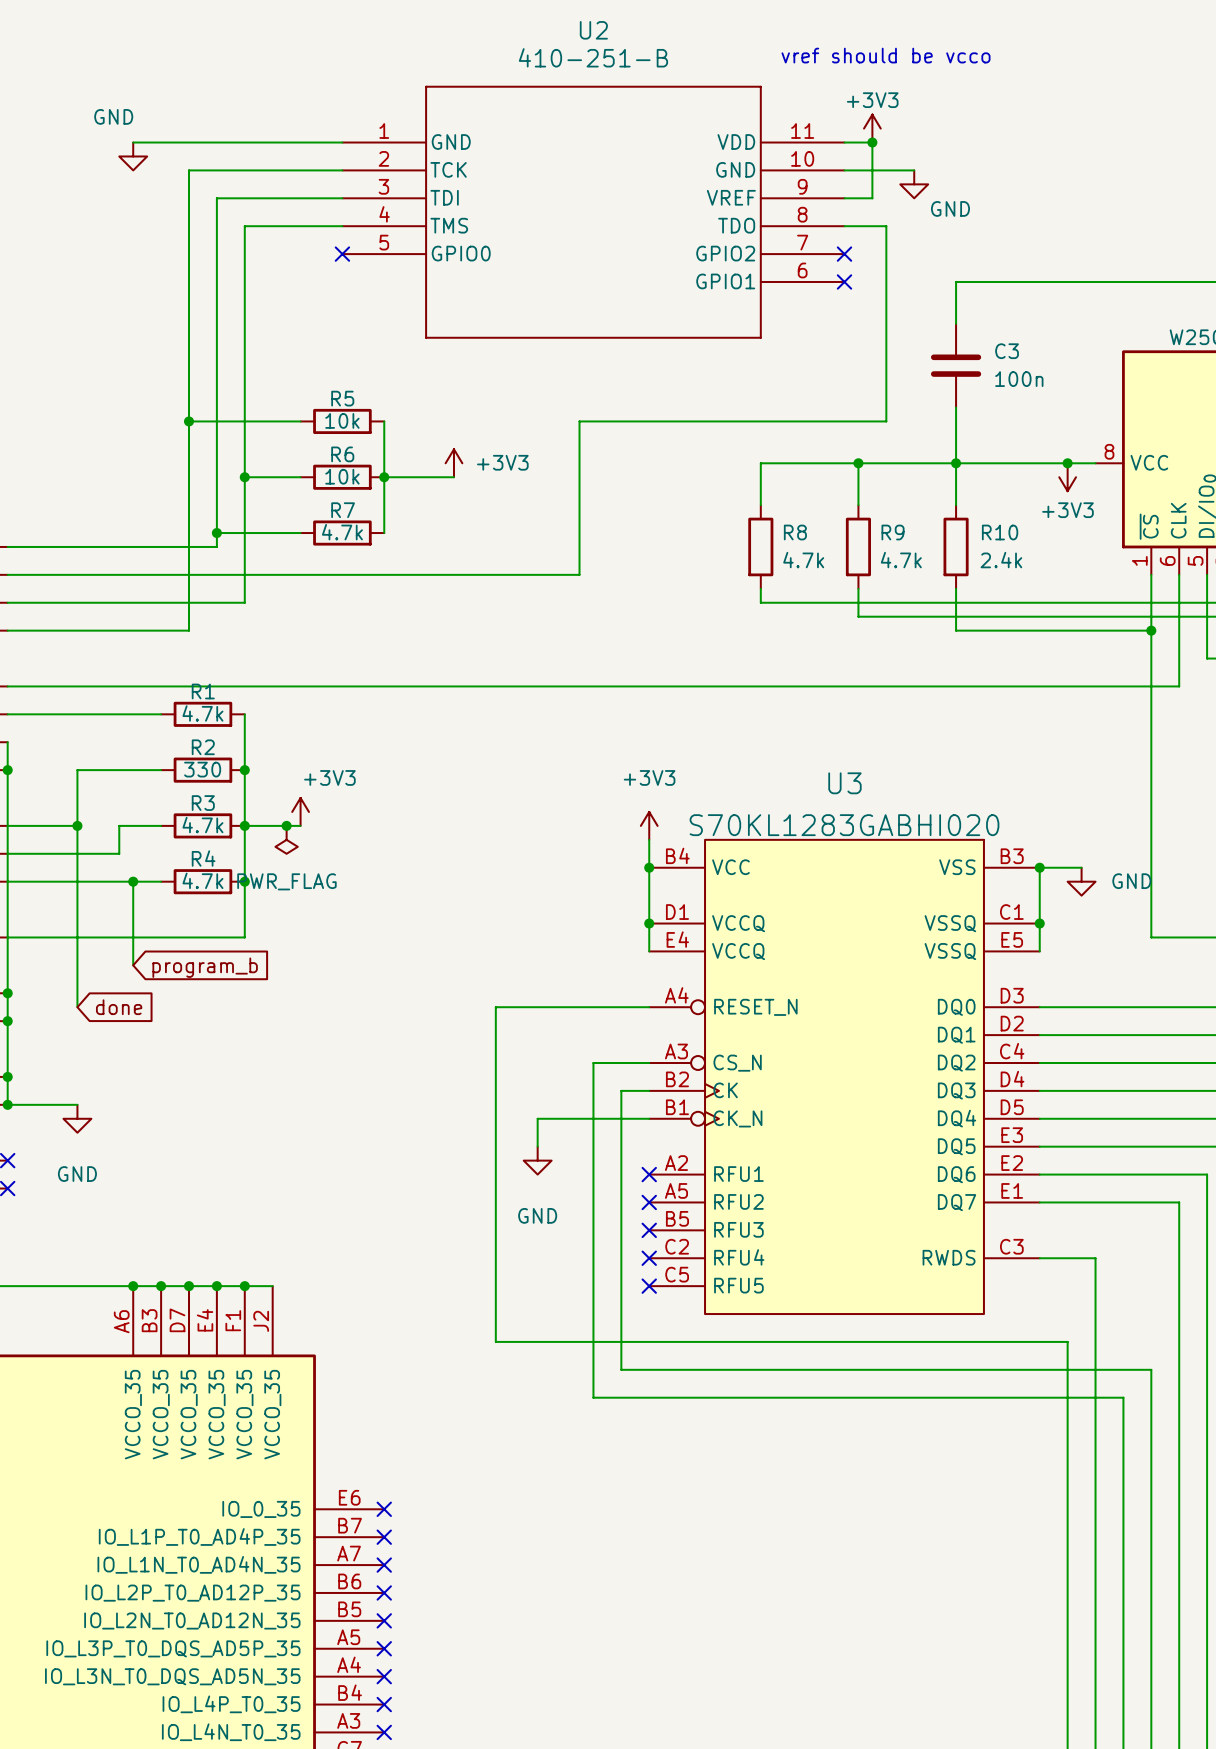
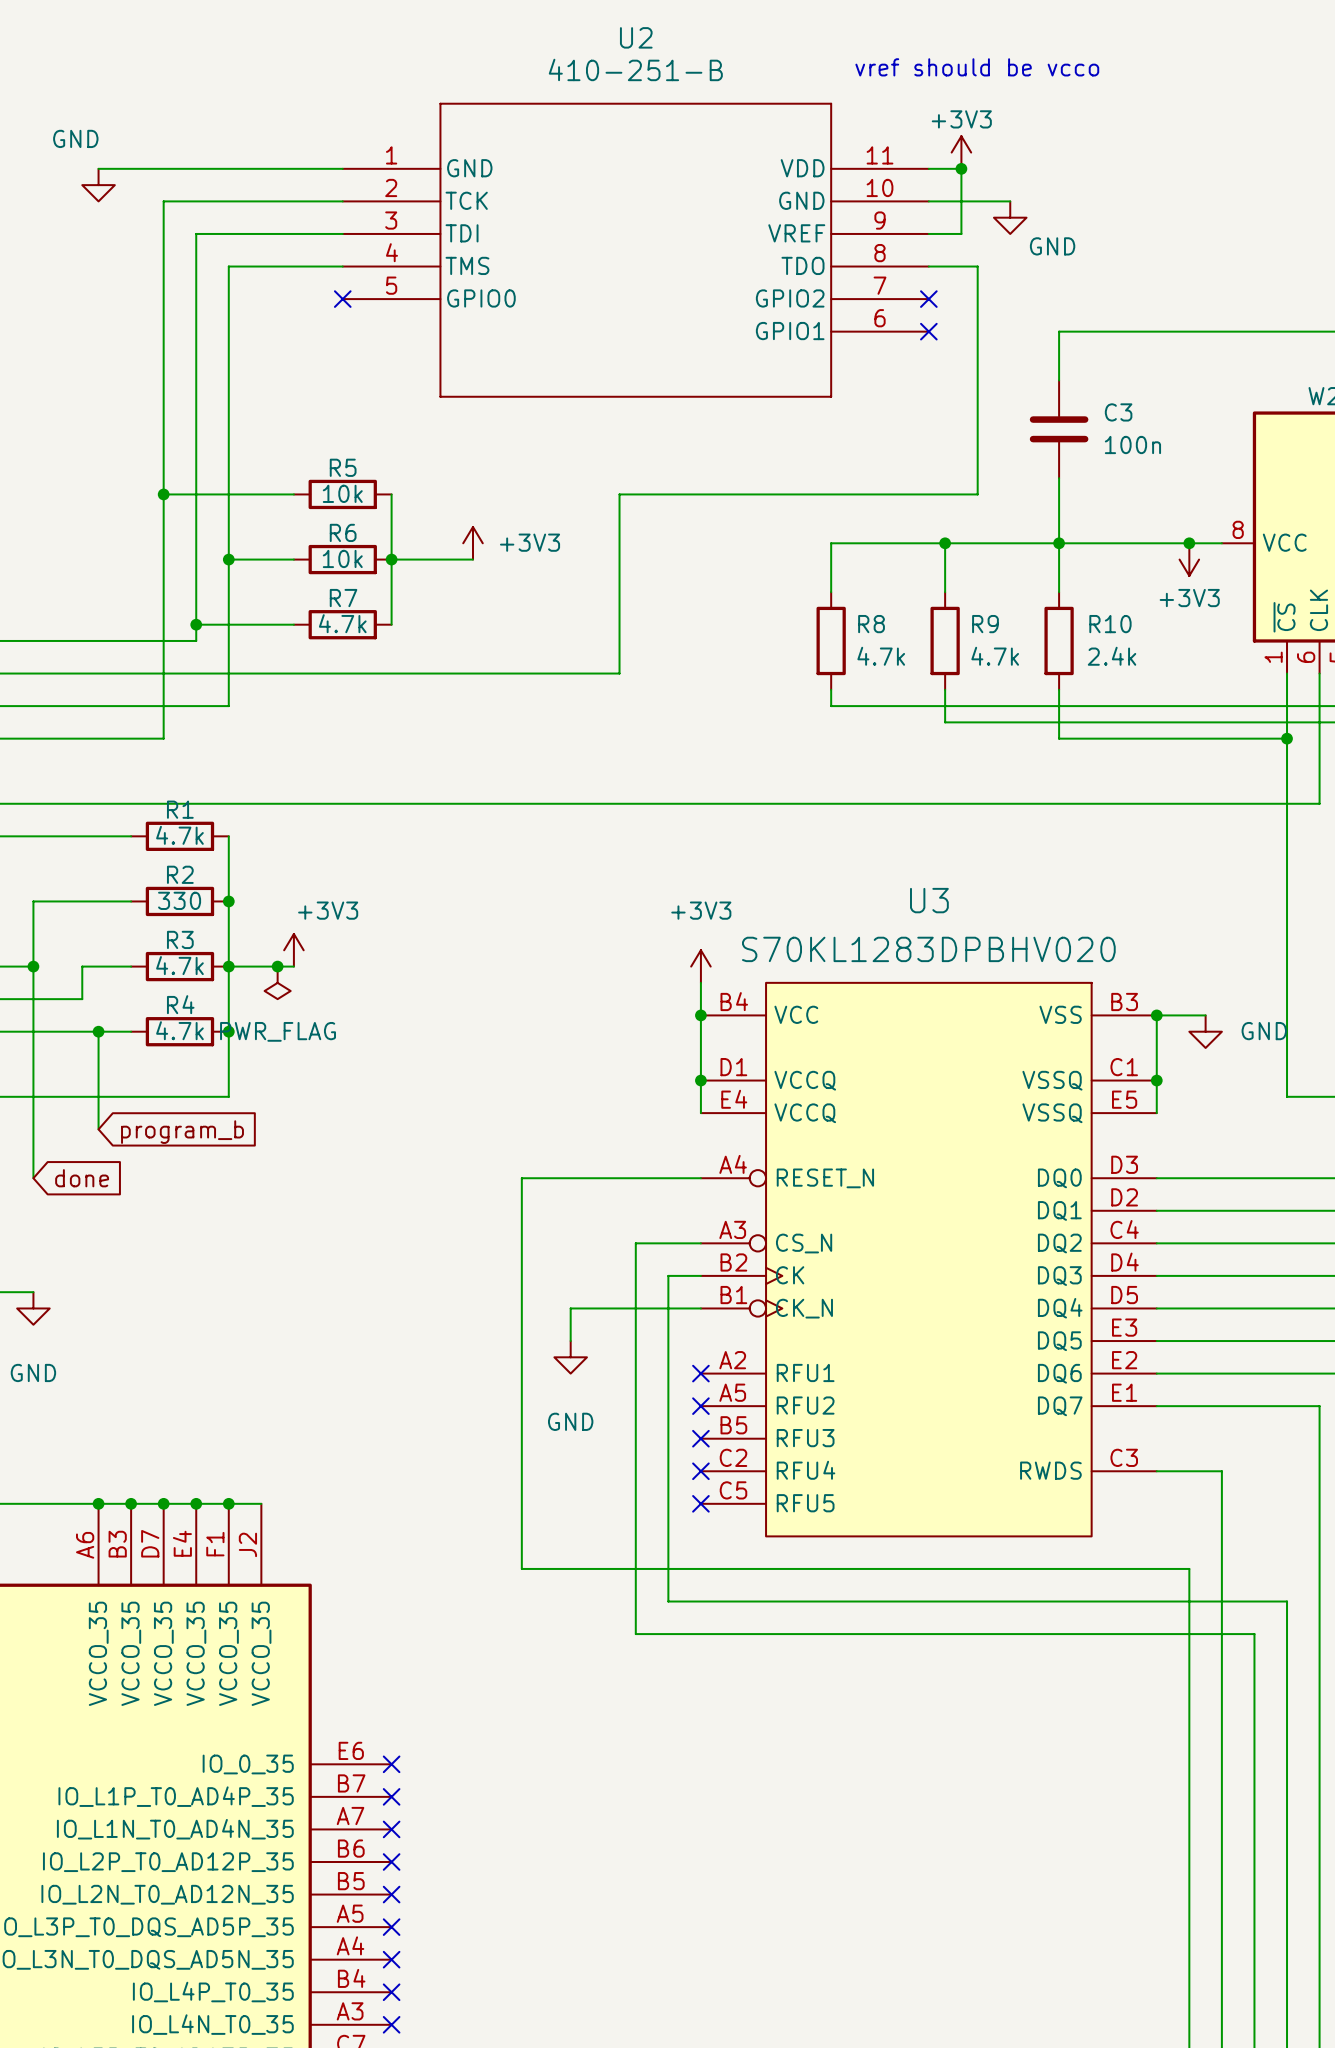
U3 name position: U3 (844, 783) -> U3 (929, 900)
U3 value: S70KL1283GABHI020 (844, 825) -> S70KL1283DPBHV020 (928, 949)

